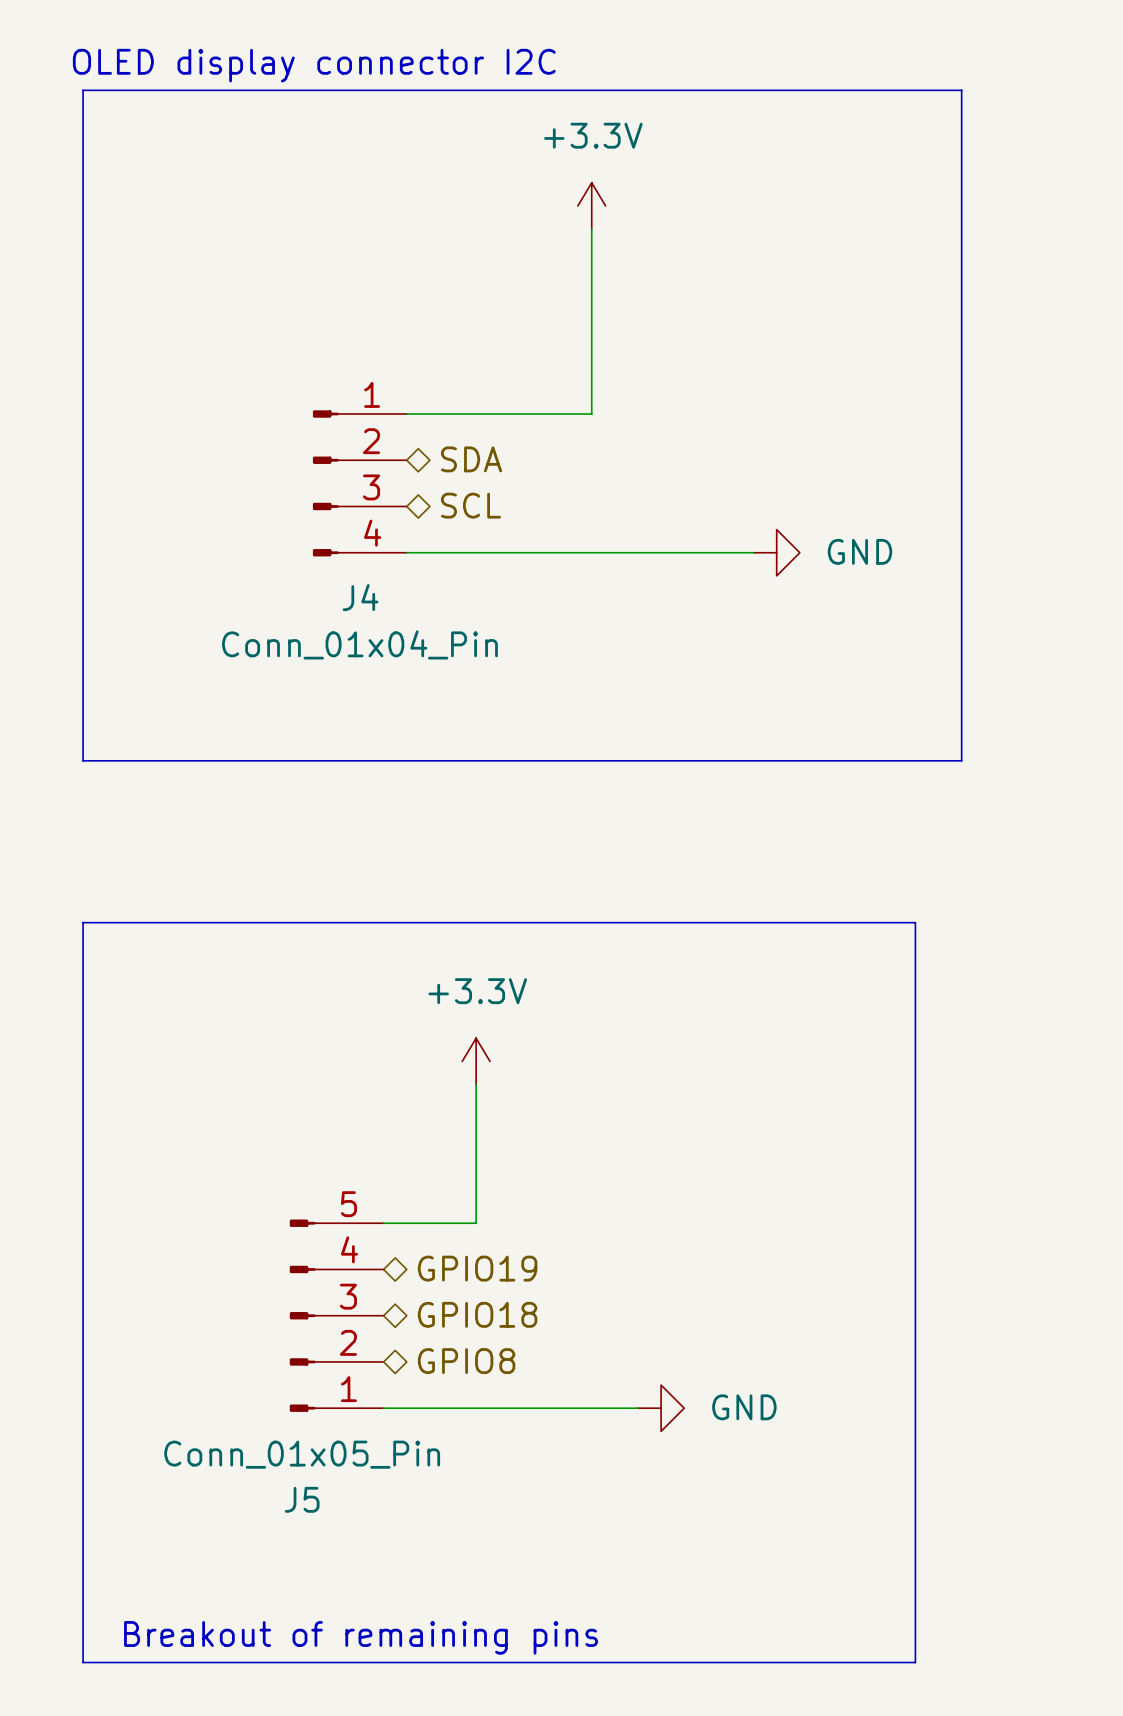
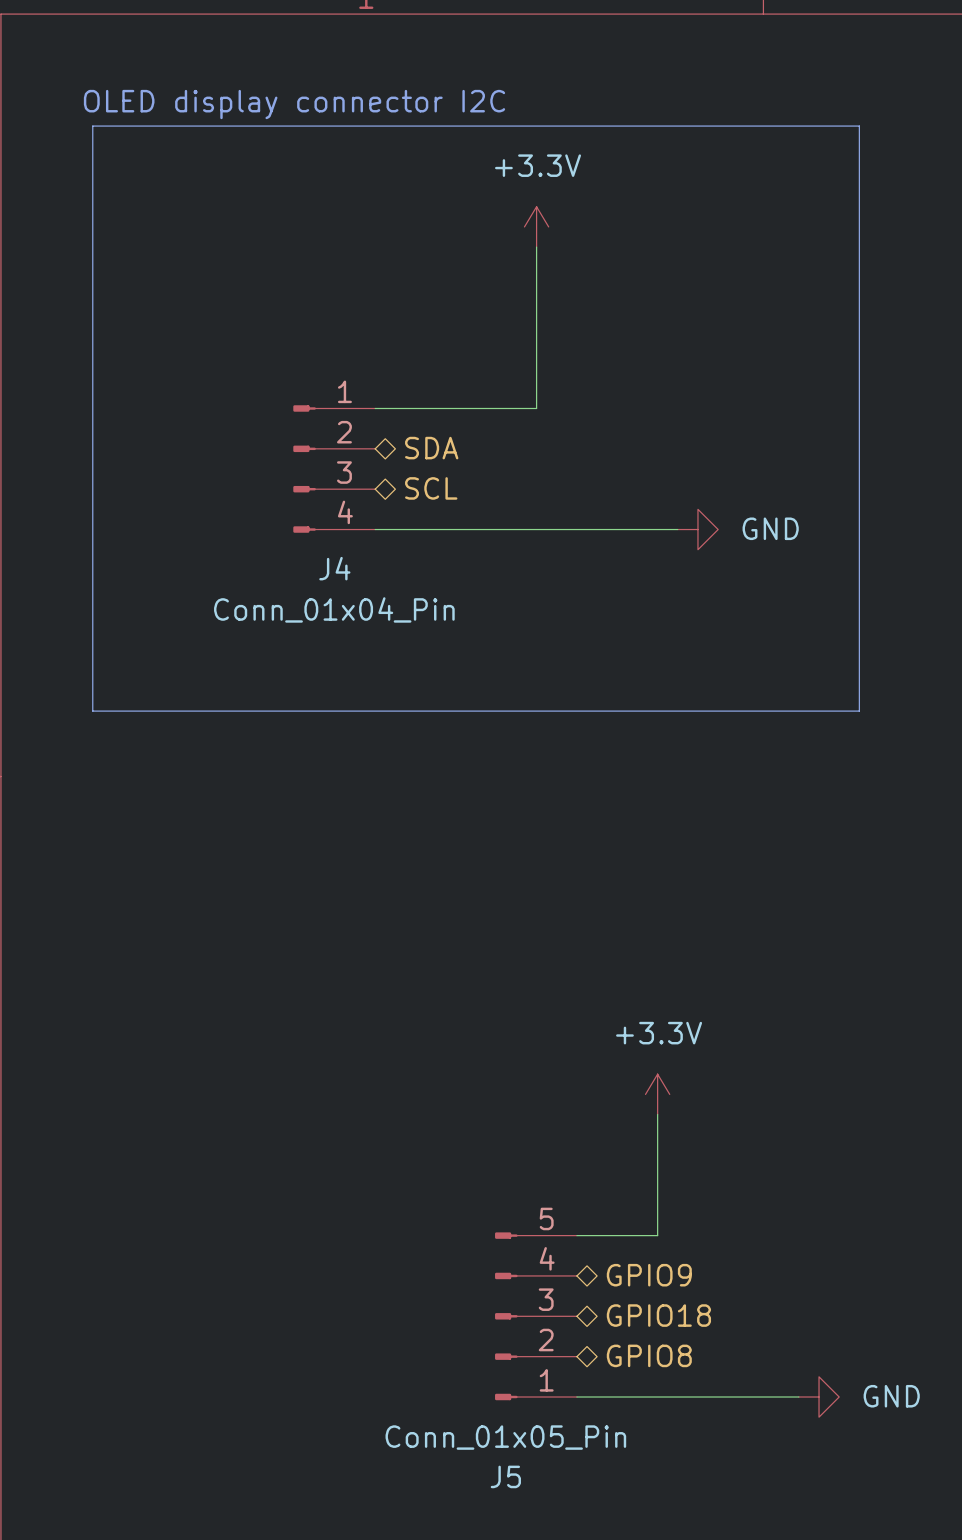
line: (83, 922) (915, 922) (915, 1662) (83, 1662) (83, 922) -> none
power symbol position: +3.3V (476, 1061) -> +3.3V (657, 1094)
wire: (476, 1084) (476, 1223) (383, 1223) -> (657, 1114) (657, 1235) (576, 1235)
hierarchical label: GPIO19 (477, 1268) -> none
hierarchical label position: GPIO18 (477, 1314) -> GPIO18 (658, 1315)
J5 position: (336, 1315) -> (535, 1316)
hierarchical label position: GPIO8 (466, 1361) -> GPIO8 (649, 1355)
hierarchical label: none -> GPIO9 (649, 1275)
wire: (383, 1408) (637, 1408) -> (576, 1397) (798, 1397)
power symbol position: GND (661, 1408) -> GND (819, 1397)
text: Breakout of remaining pins (361, 1637) -> none

